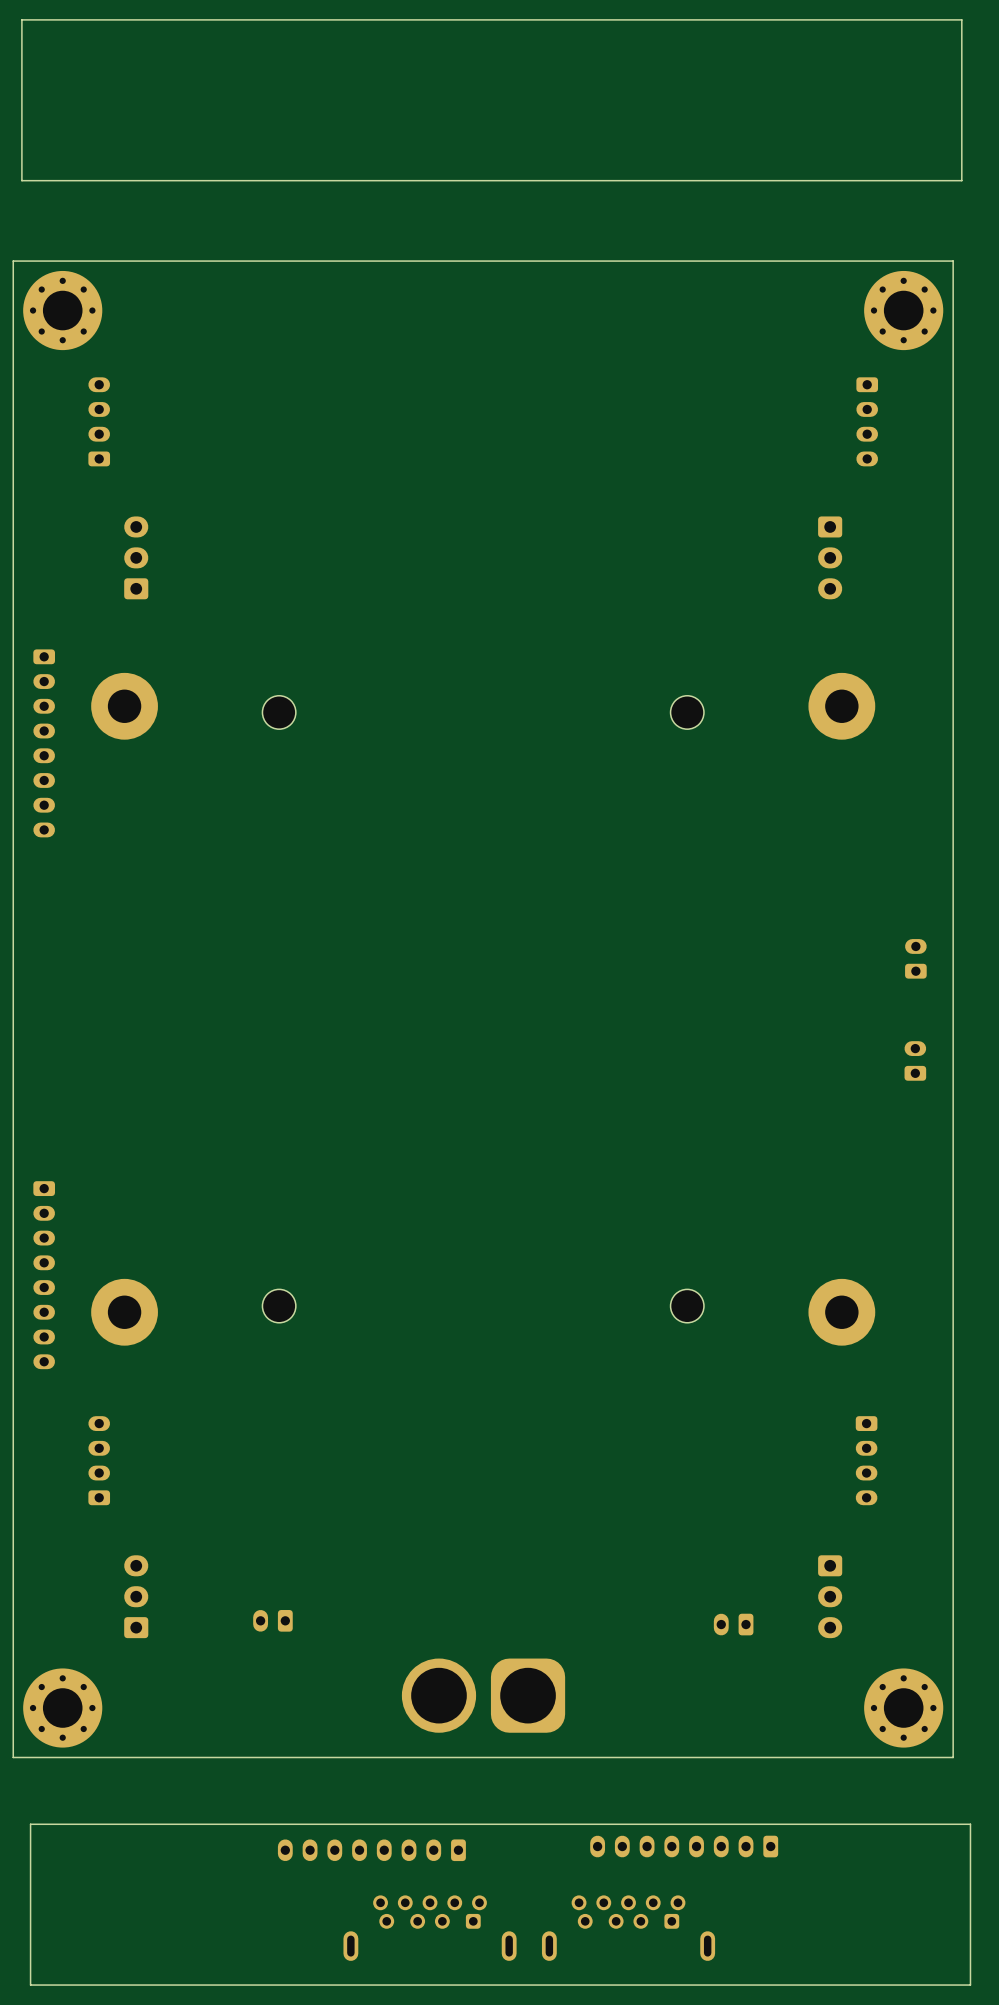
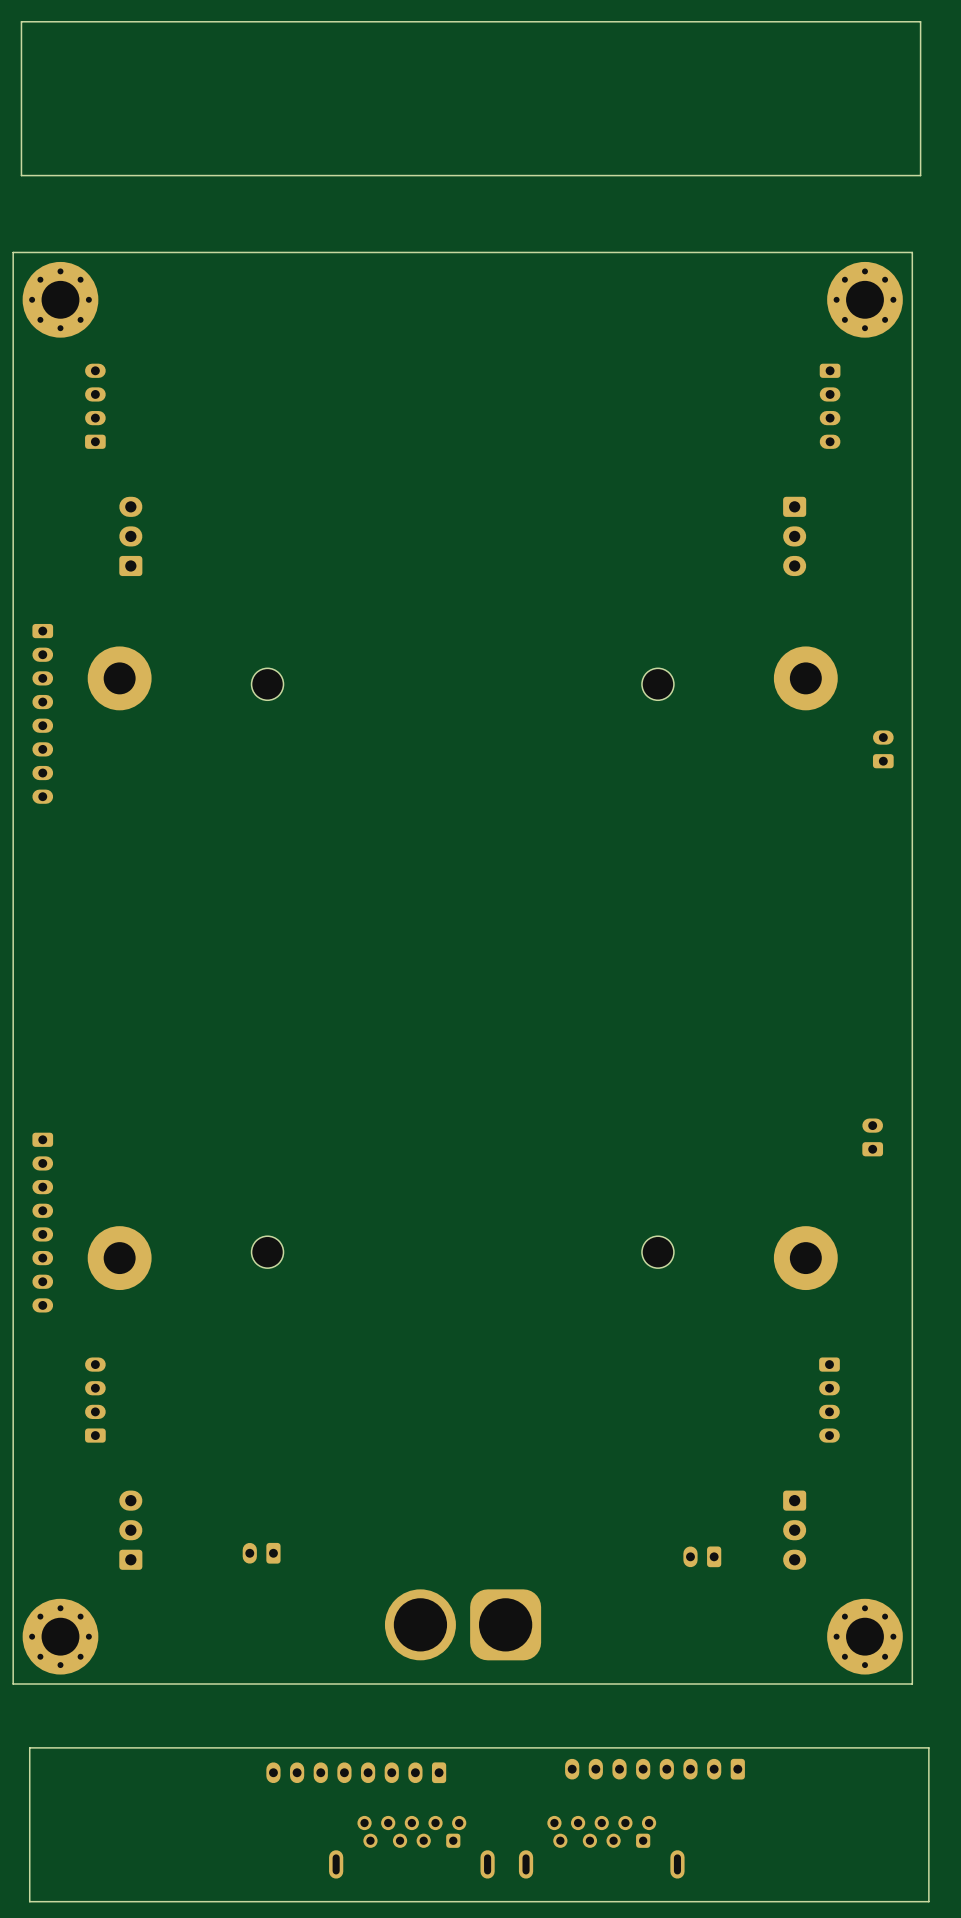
part: none -> (883, 749)
part: (915, 958) -> none
part: (915, 1060) -> none
part: none -> (872, 1137)

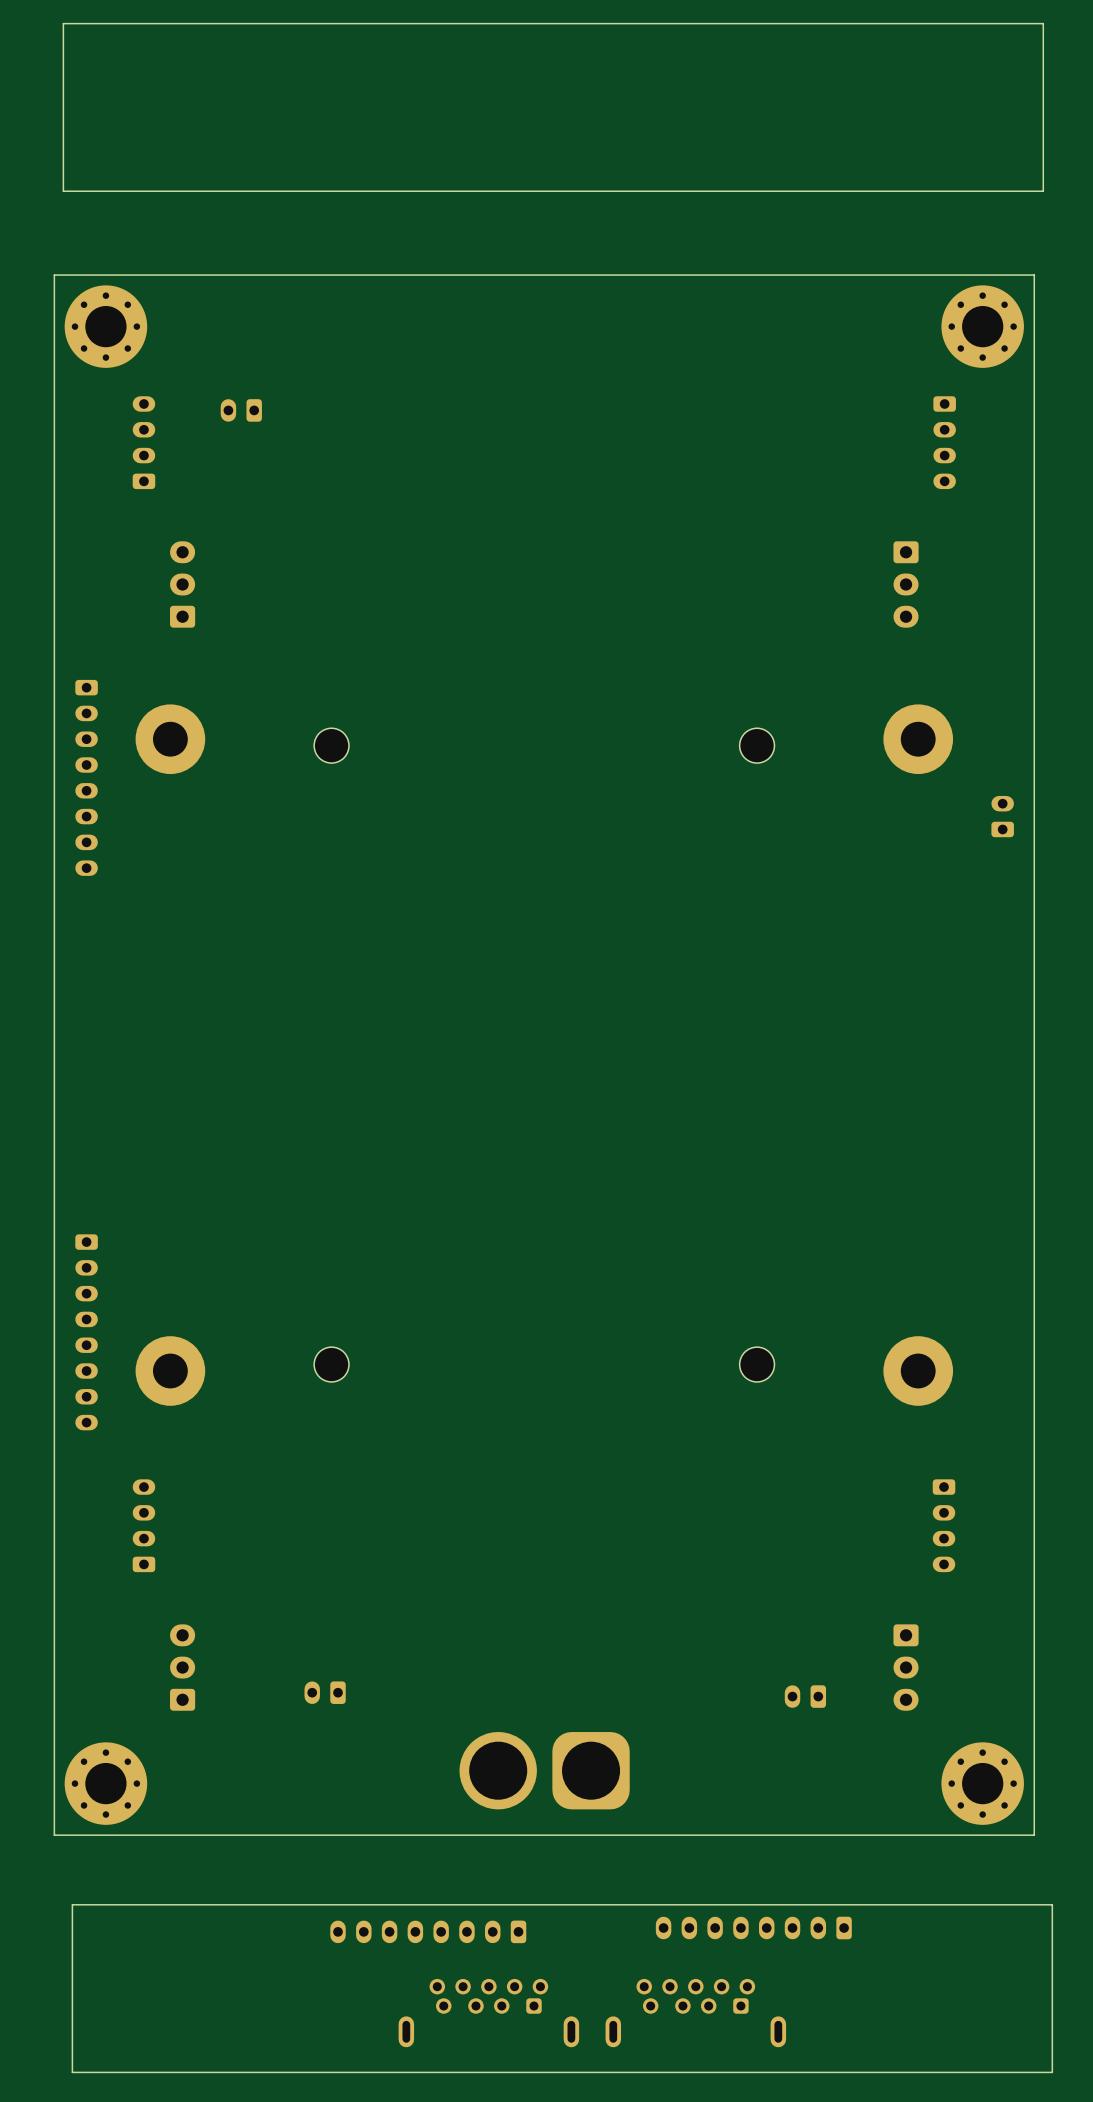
part: none -> (241, 410)
part: (872, 1137) -> none

